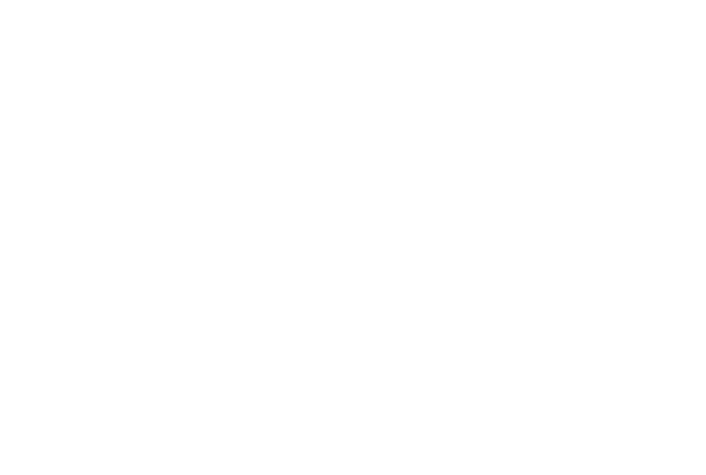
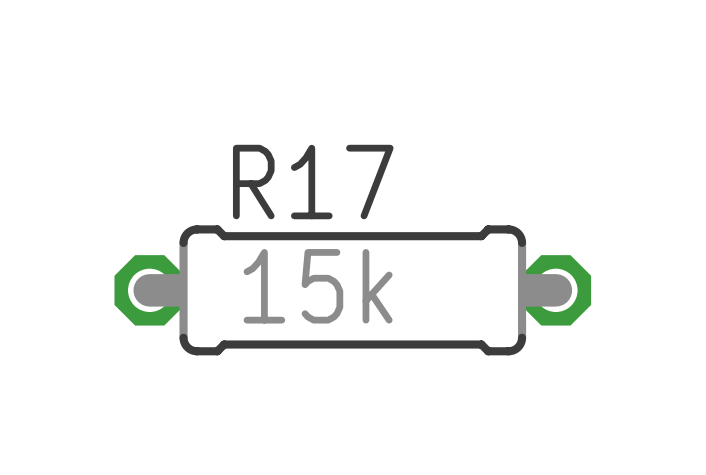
R17: none -> 15k (352, 290)

